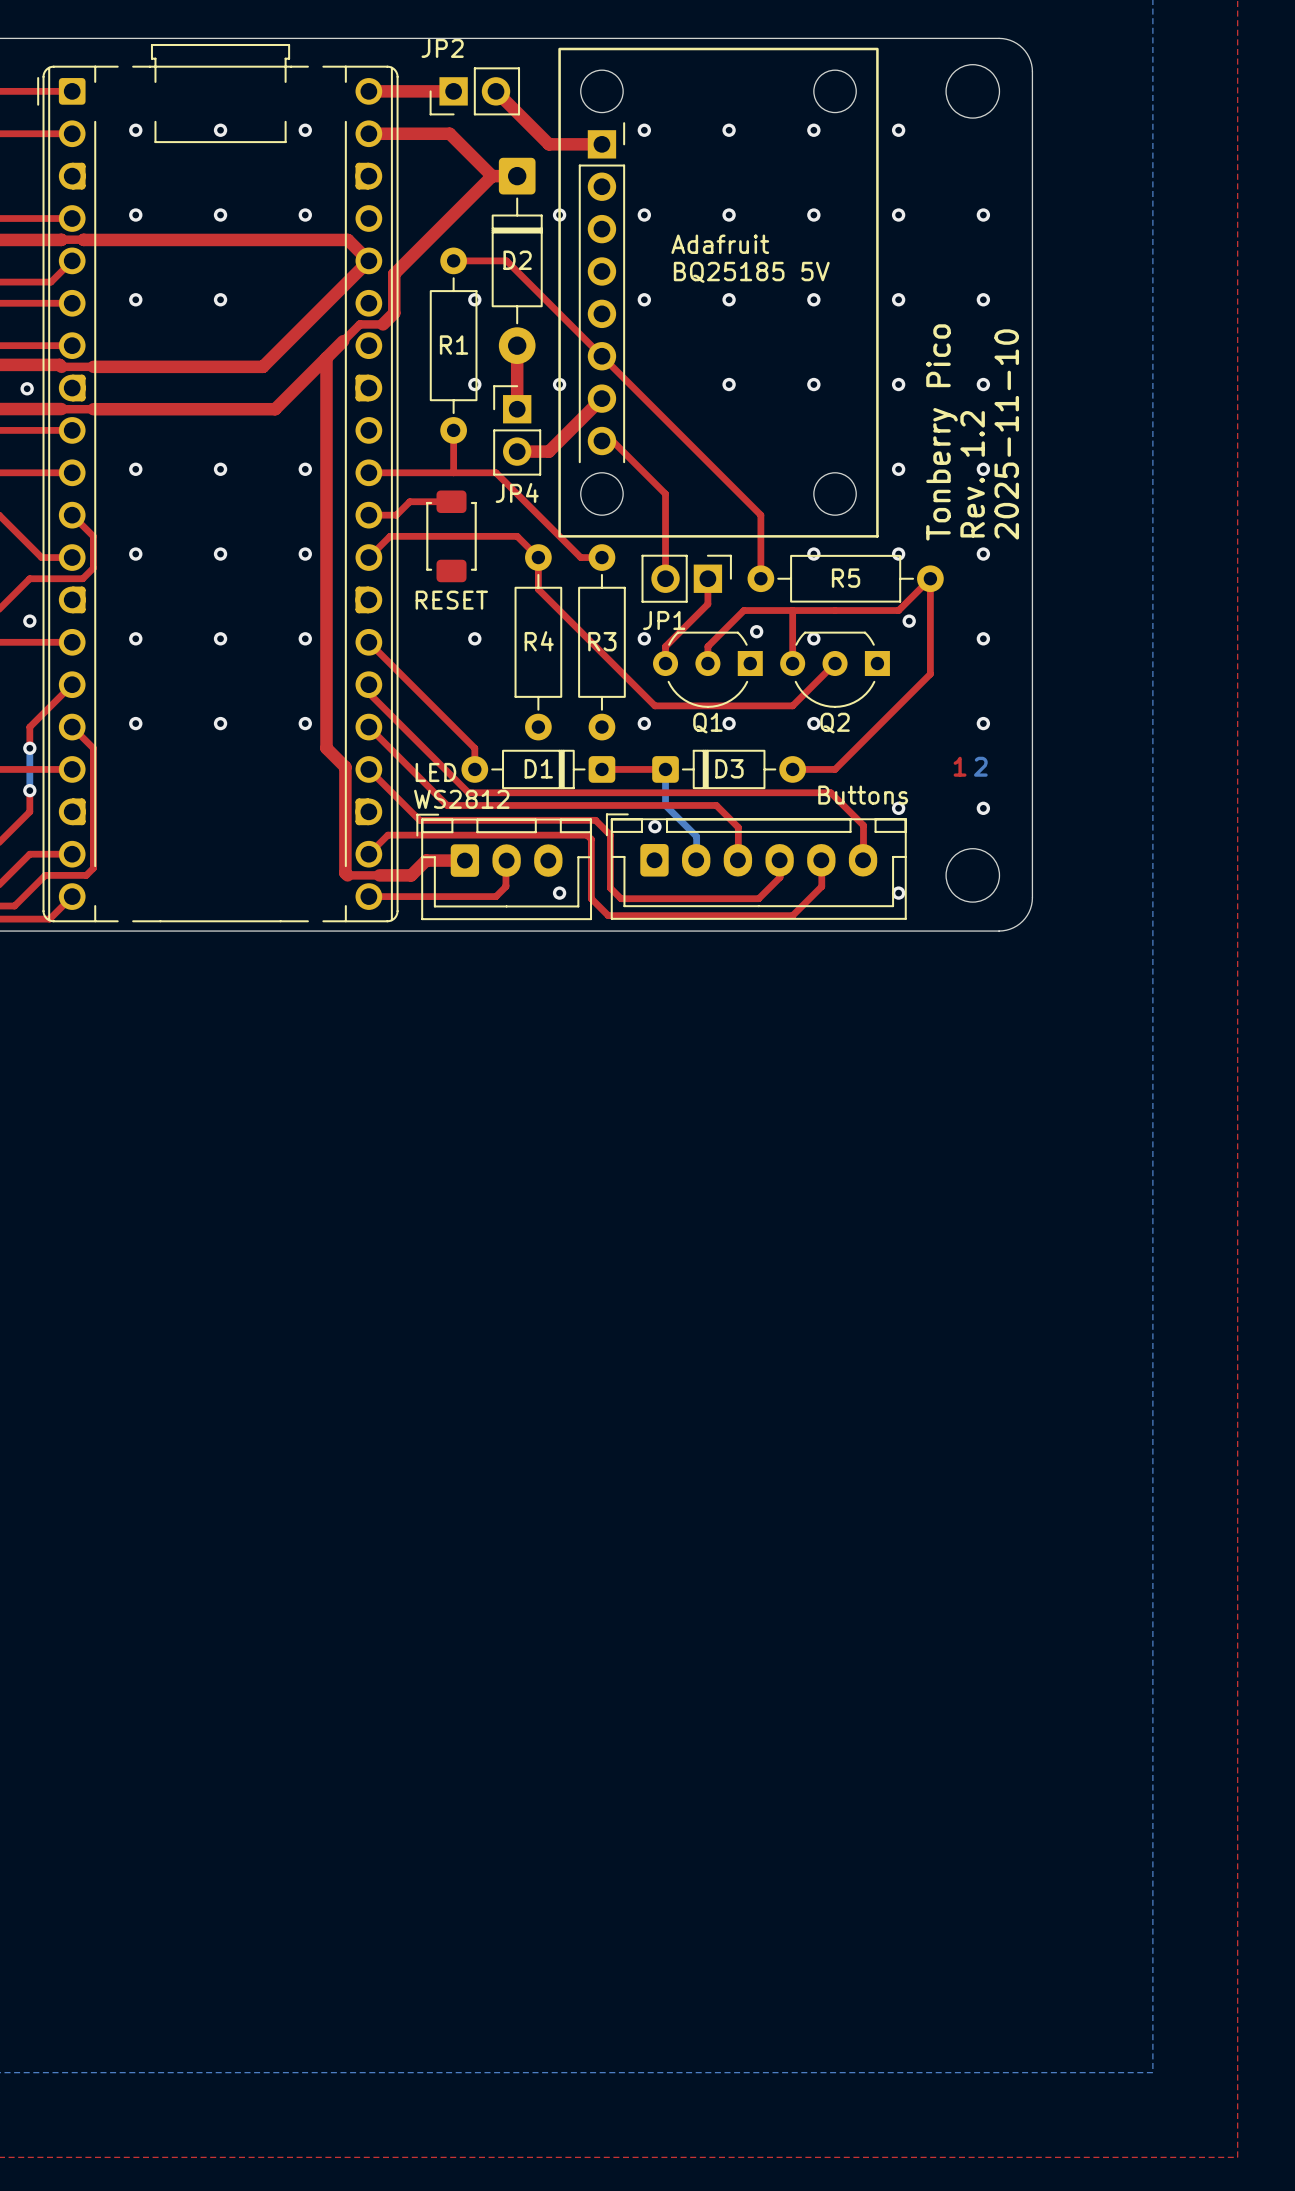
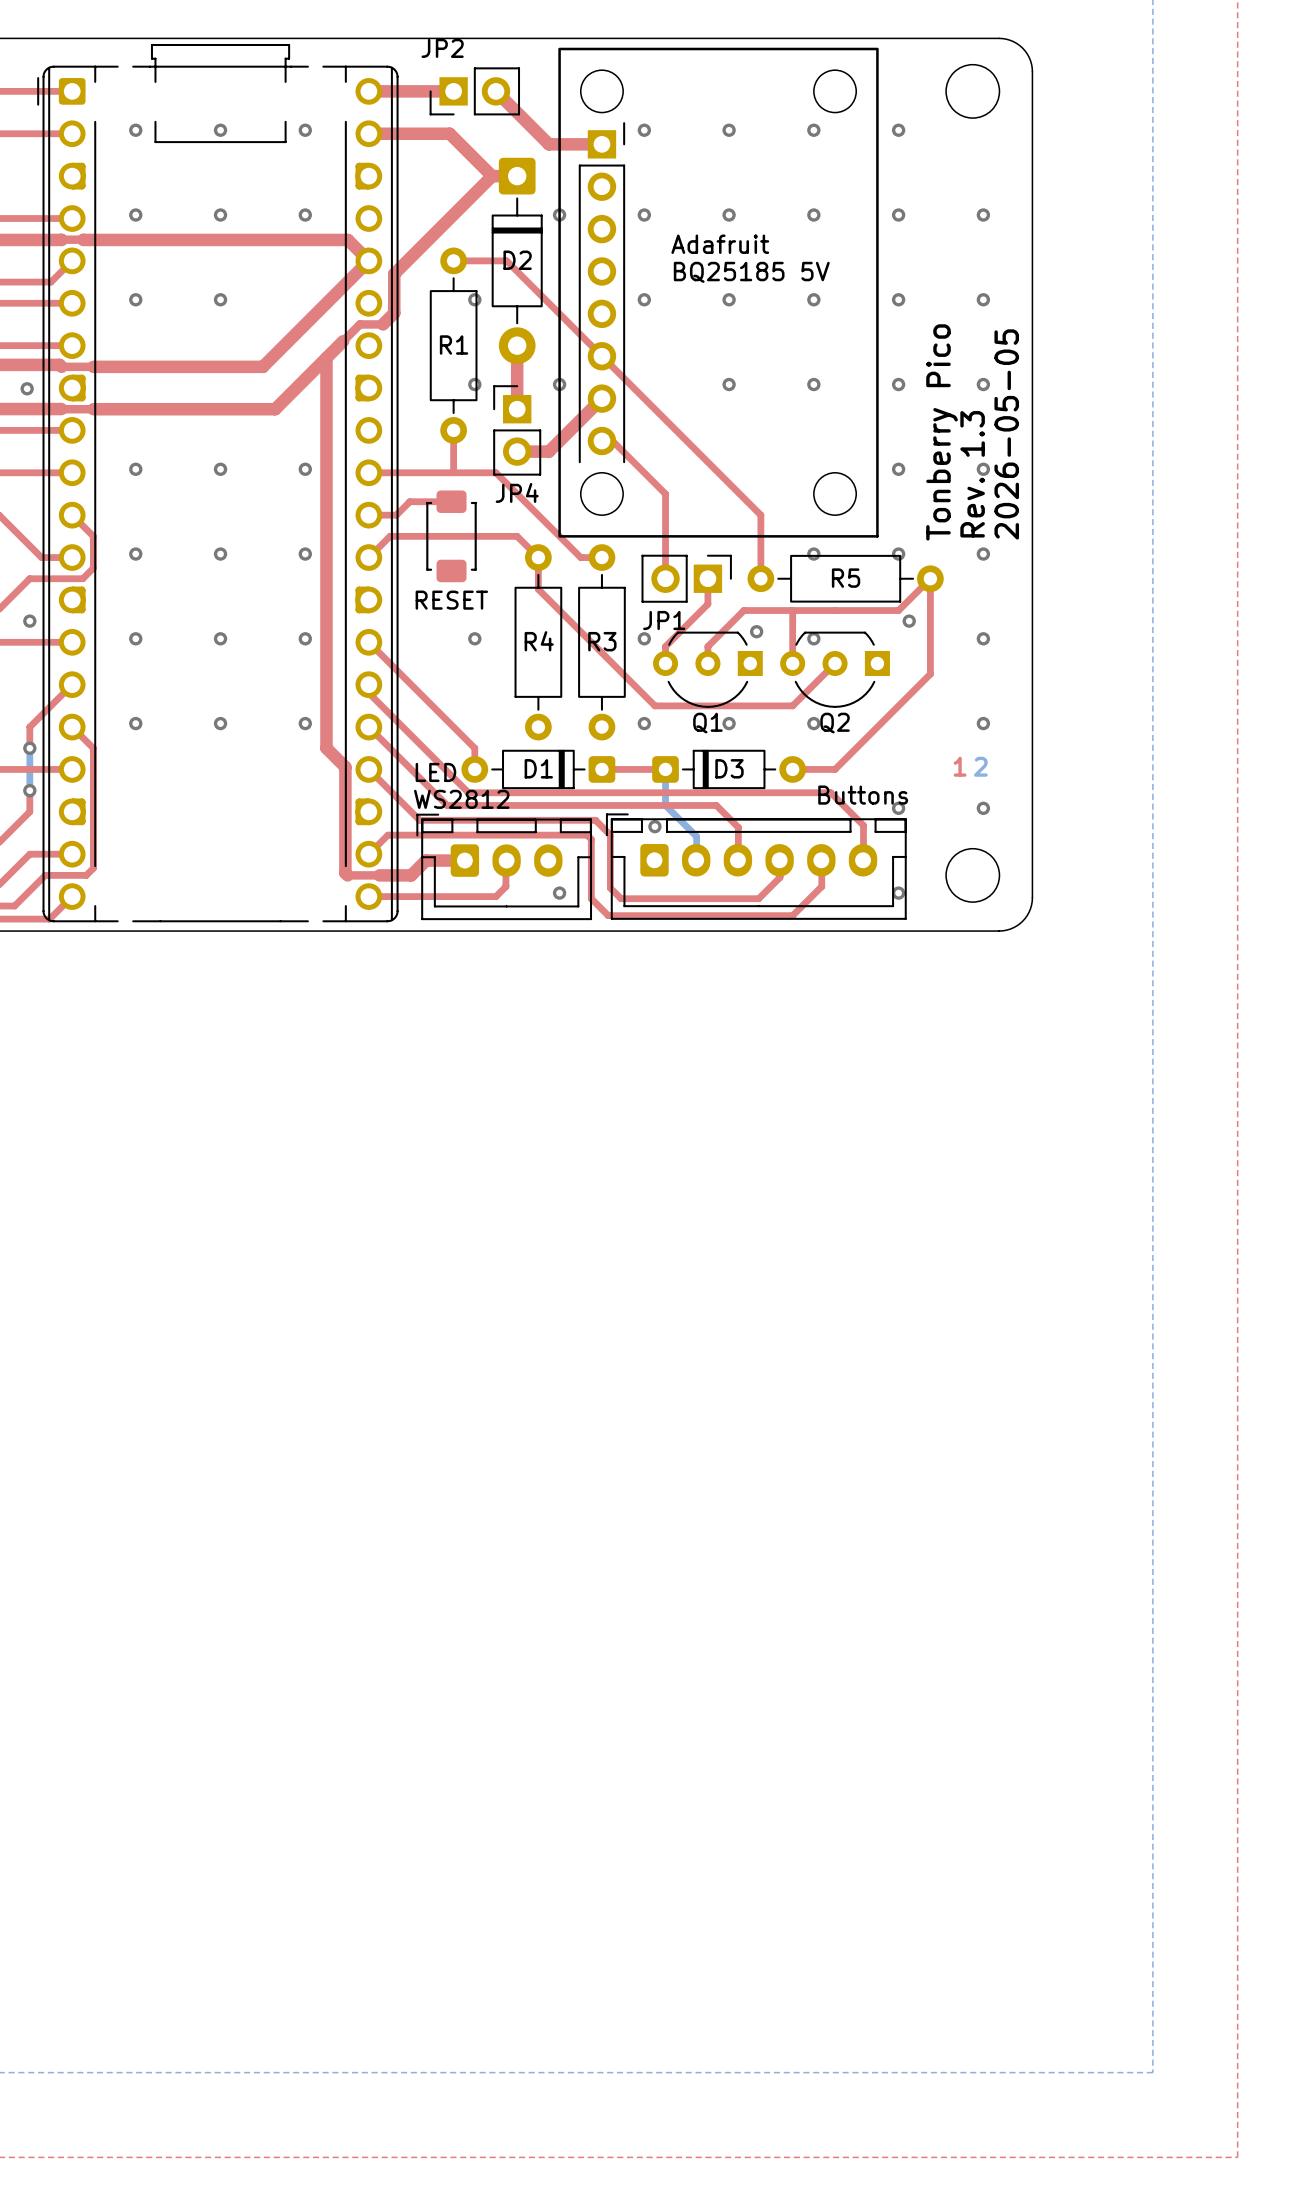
text: 2025-11-10 (1006, 434) -> 2026-05-05 (1006, 434)
text: Rev. 1.2 (972, 474) -> Rev. 1.3 (972, 474)

